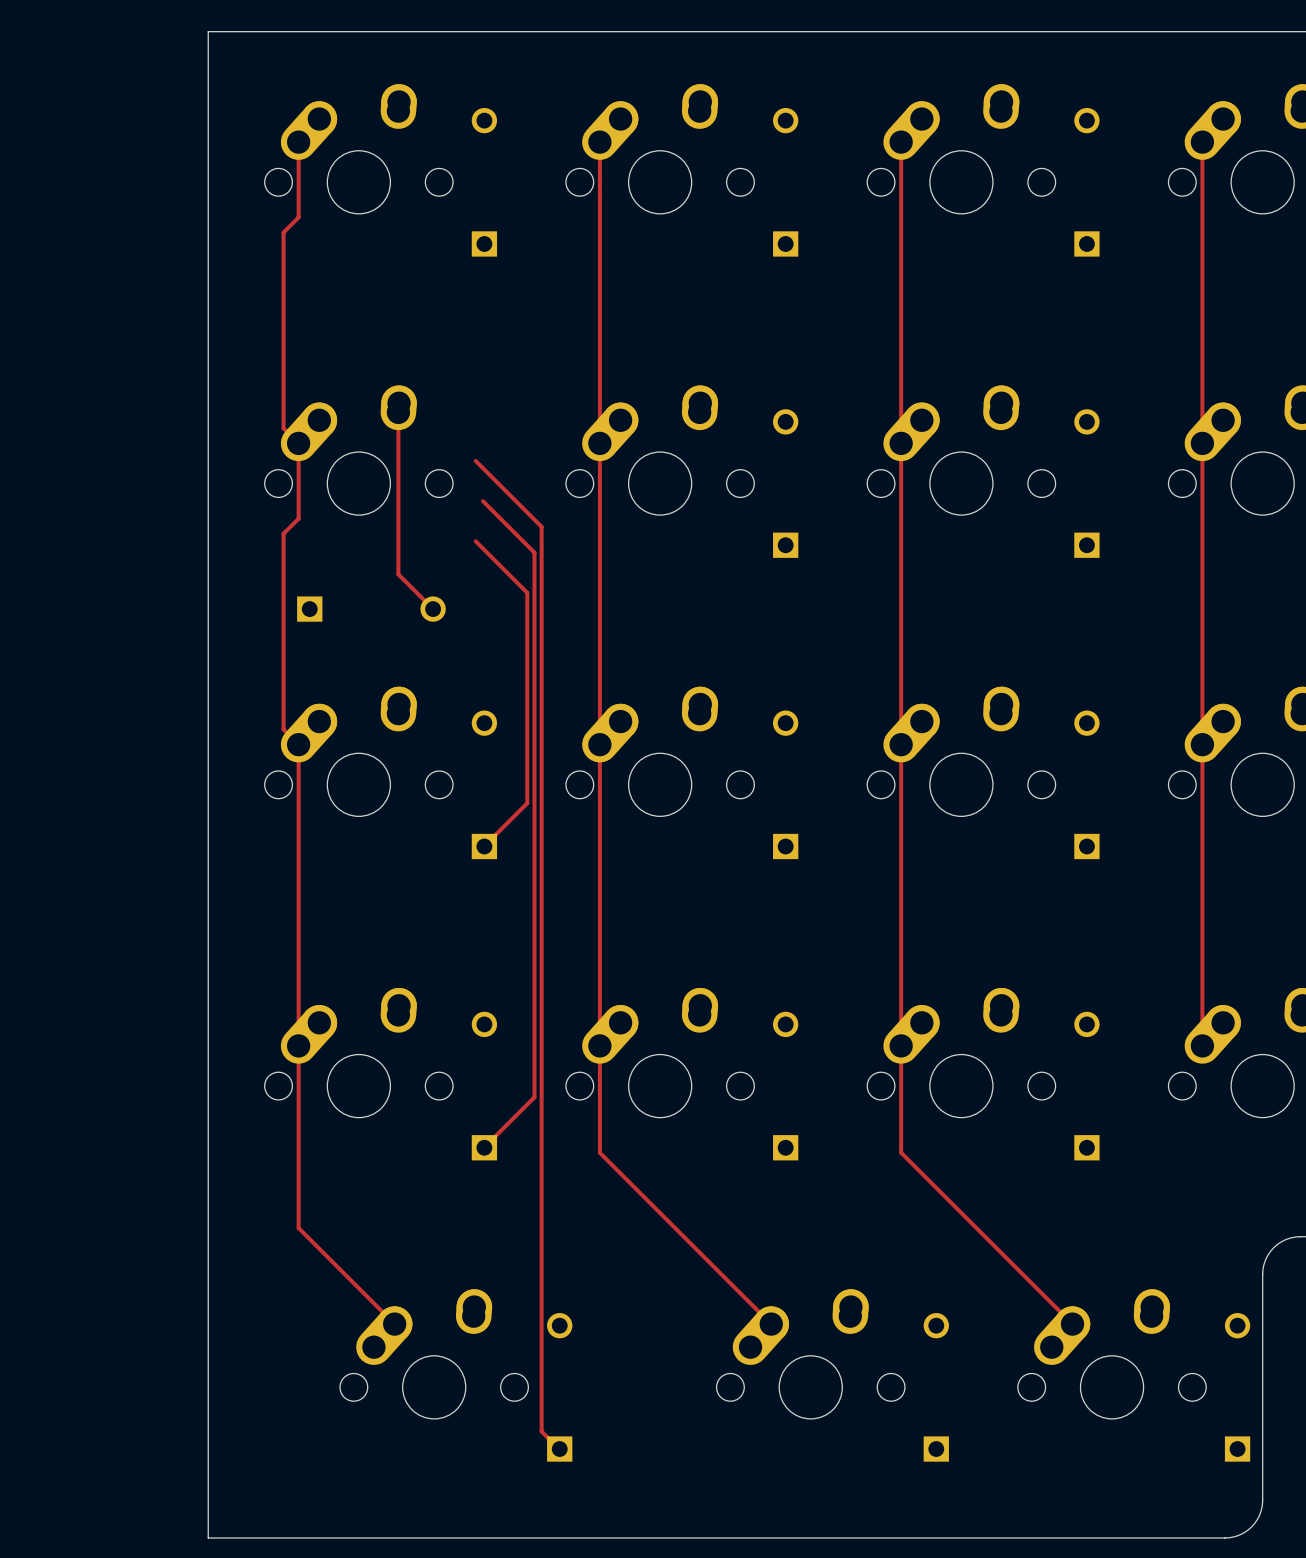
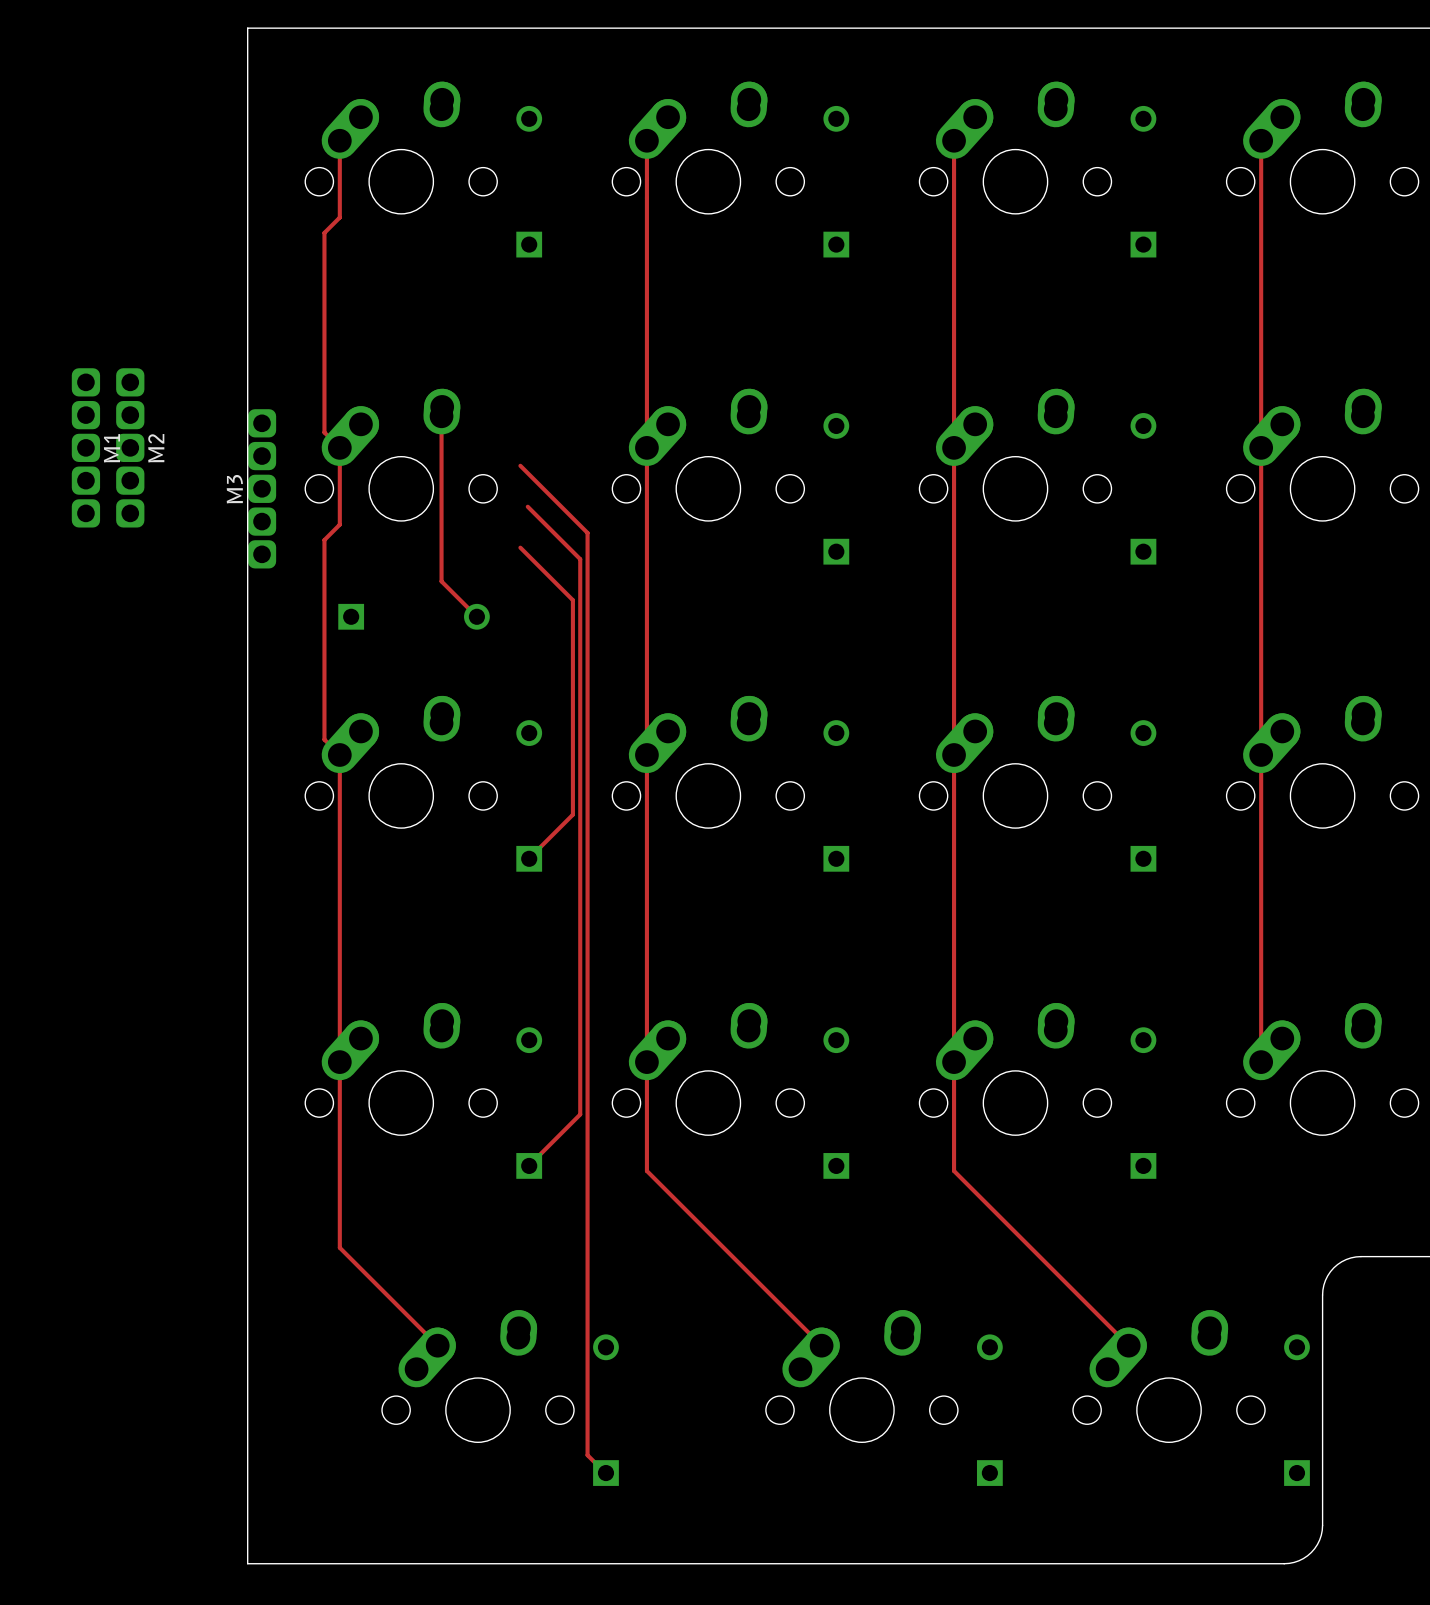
M1: none -> (85, 447)
M2: none -> (130, 447)
M3: none -> (262, 488)

